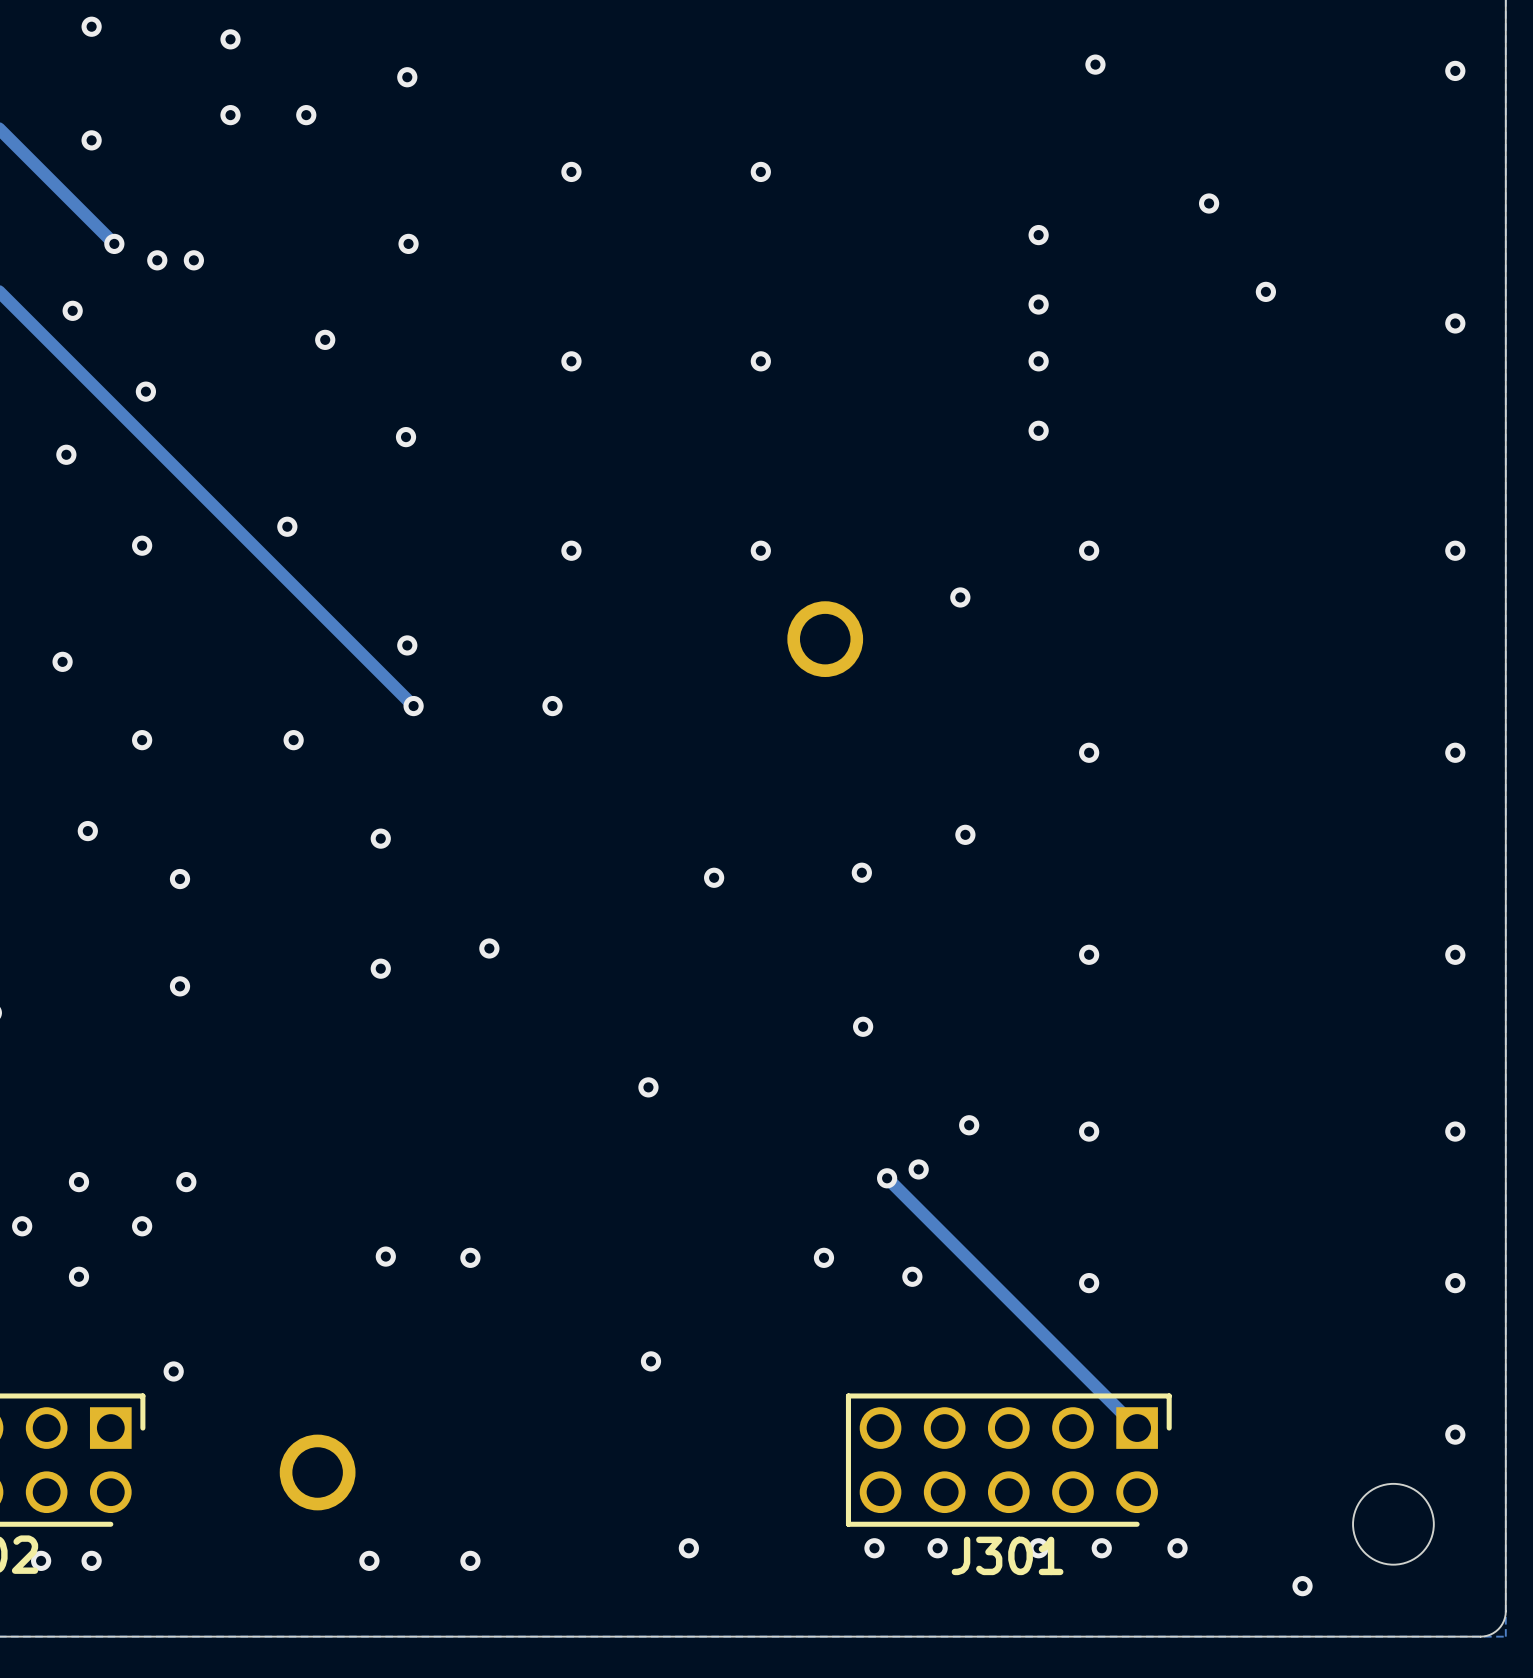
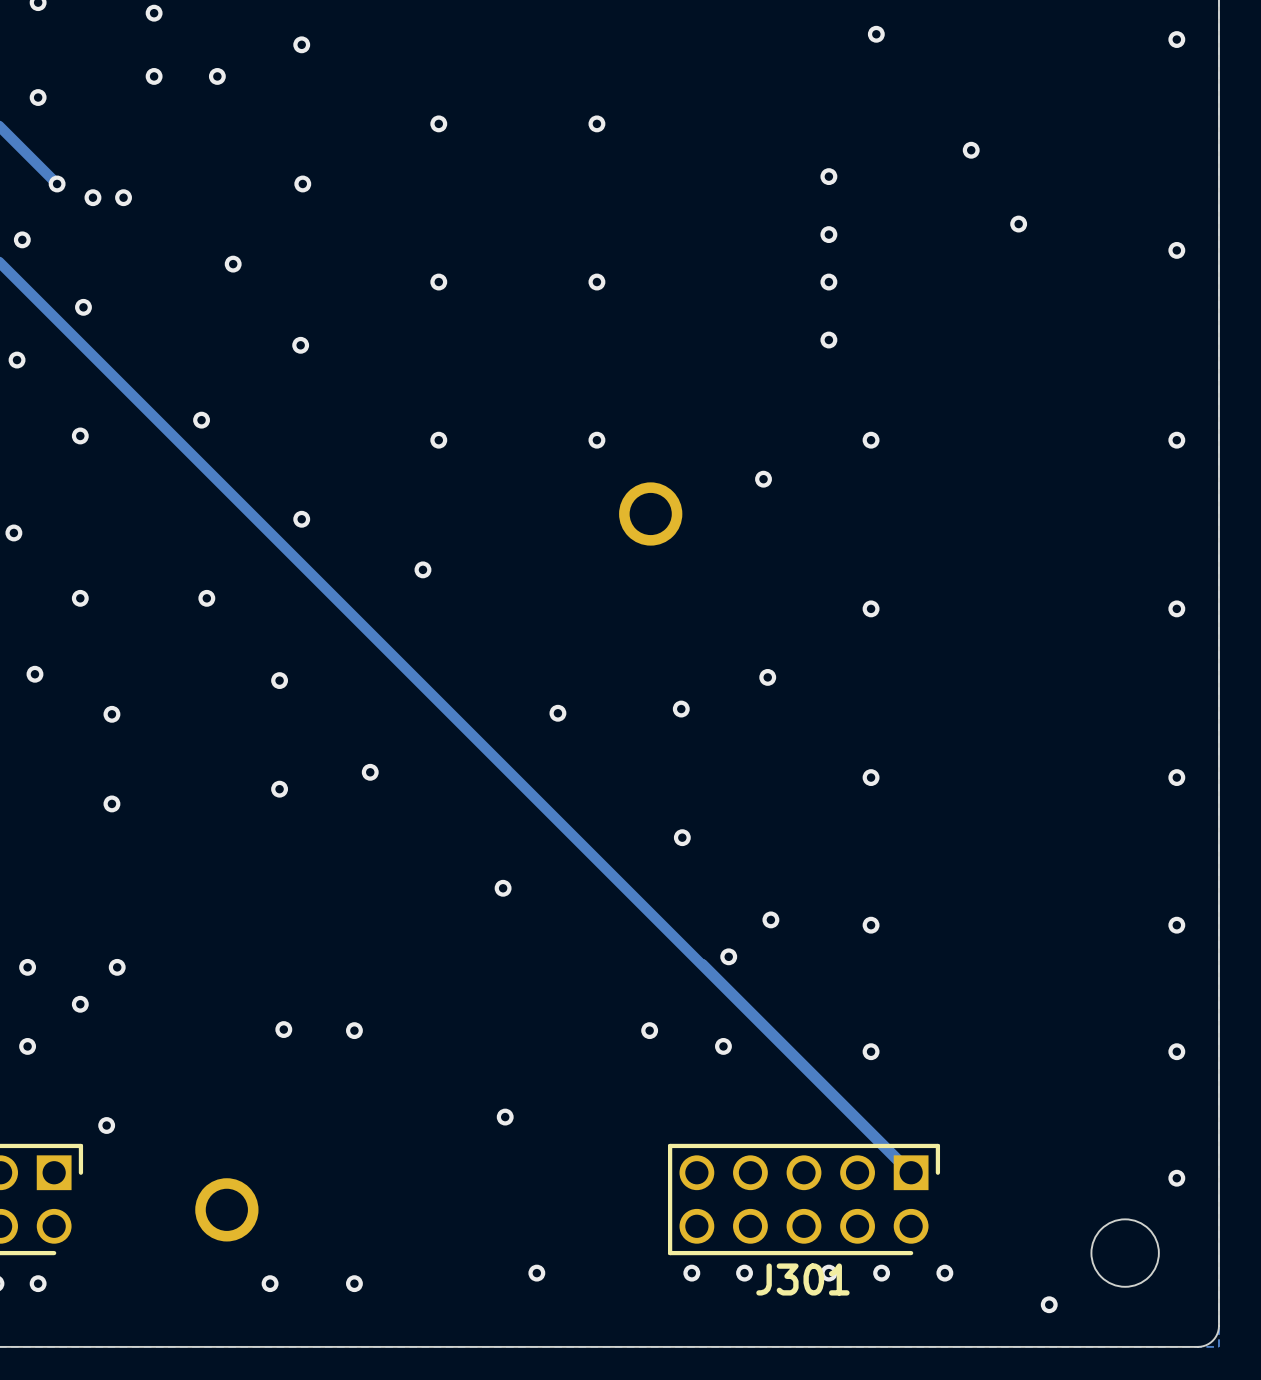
track: none -> (306, 569) (909, 1172)
via: (413, 706) -> none
via: (887, 1178) -> none

